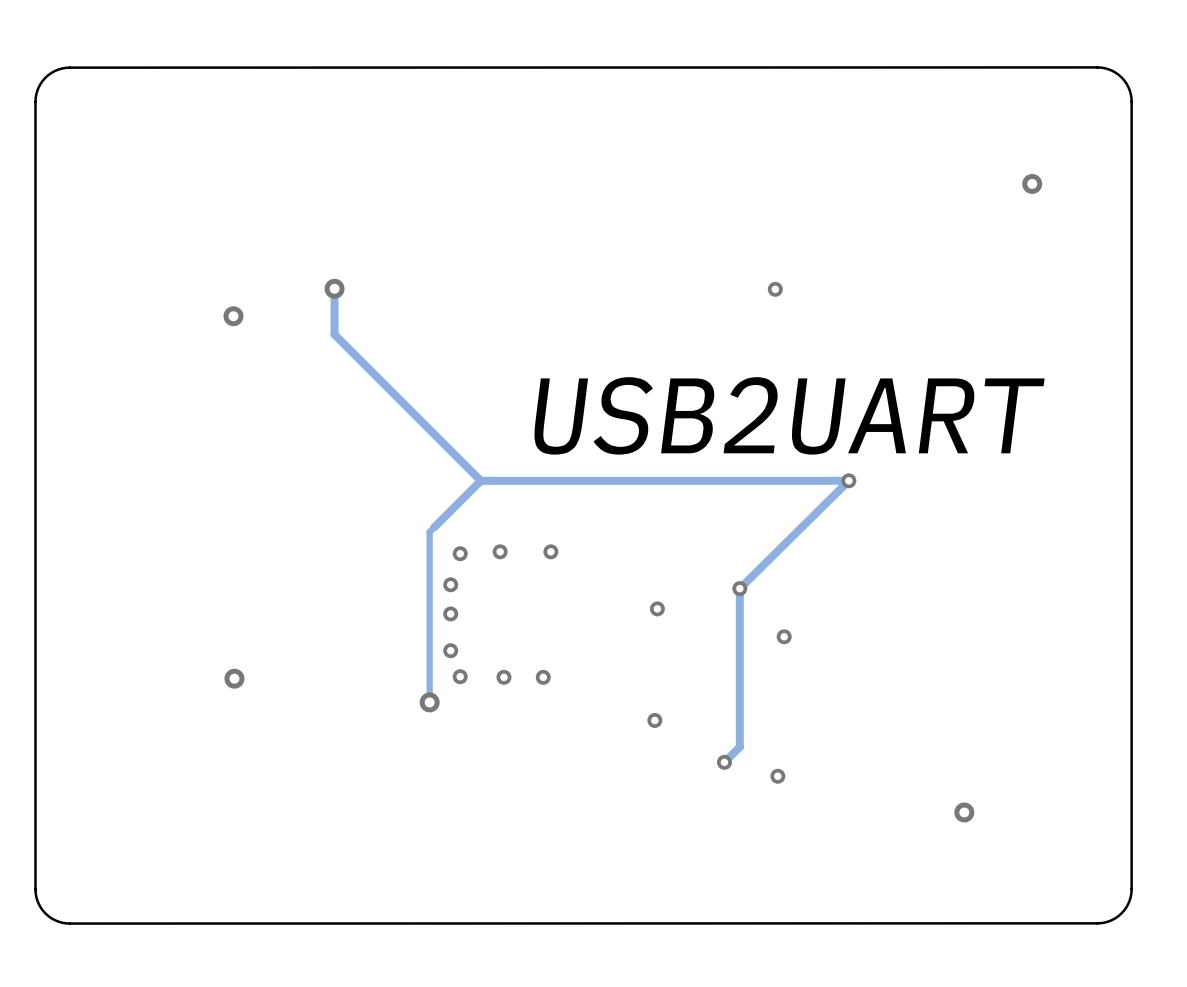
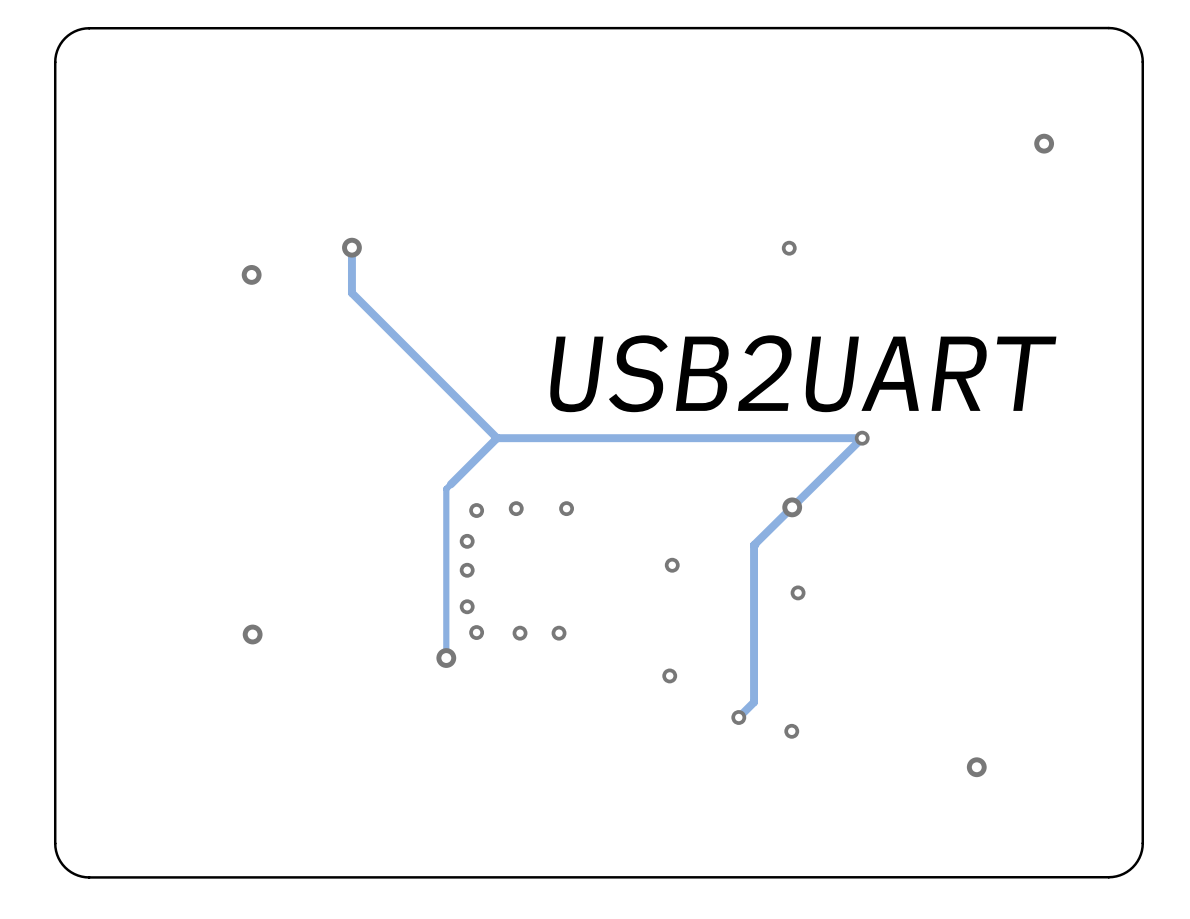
via: none -> (792, 507)
via: (739, 588) -> none

